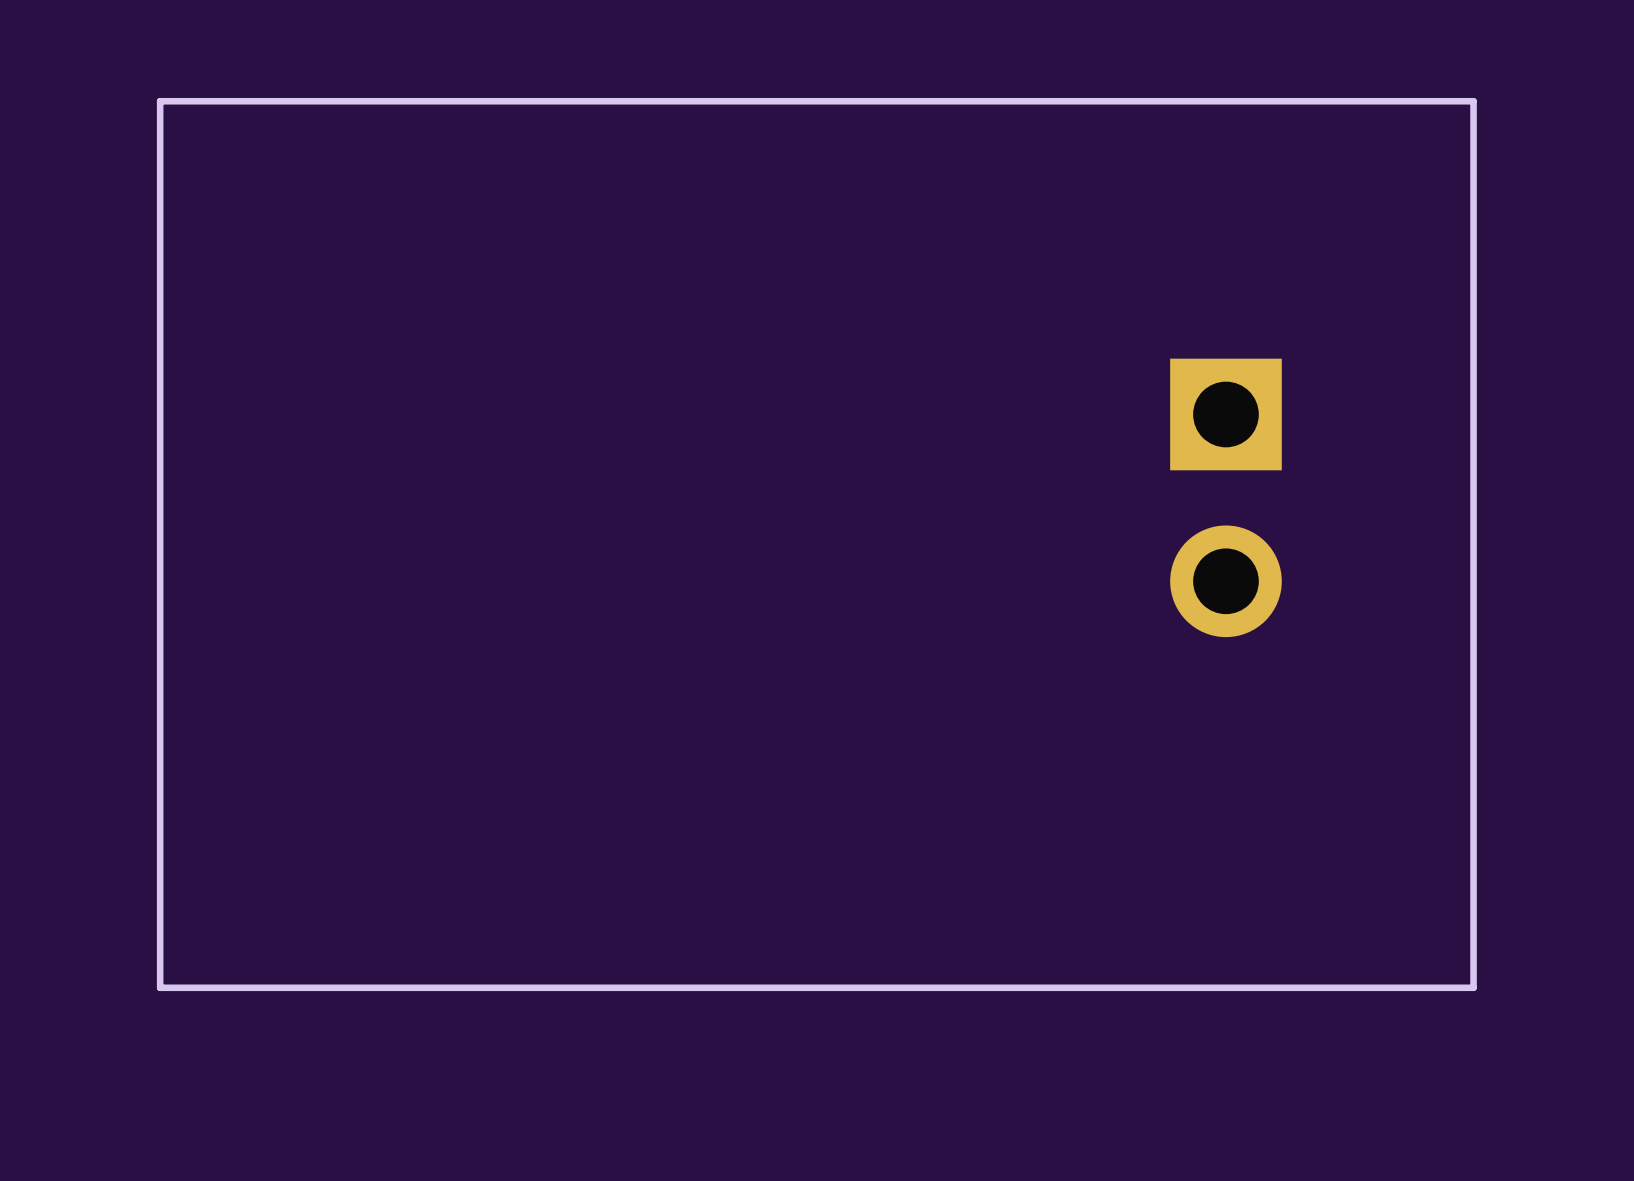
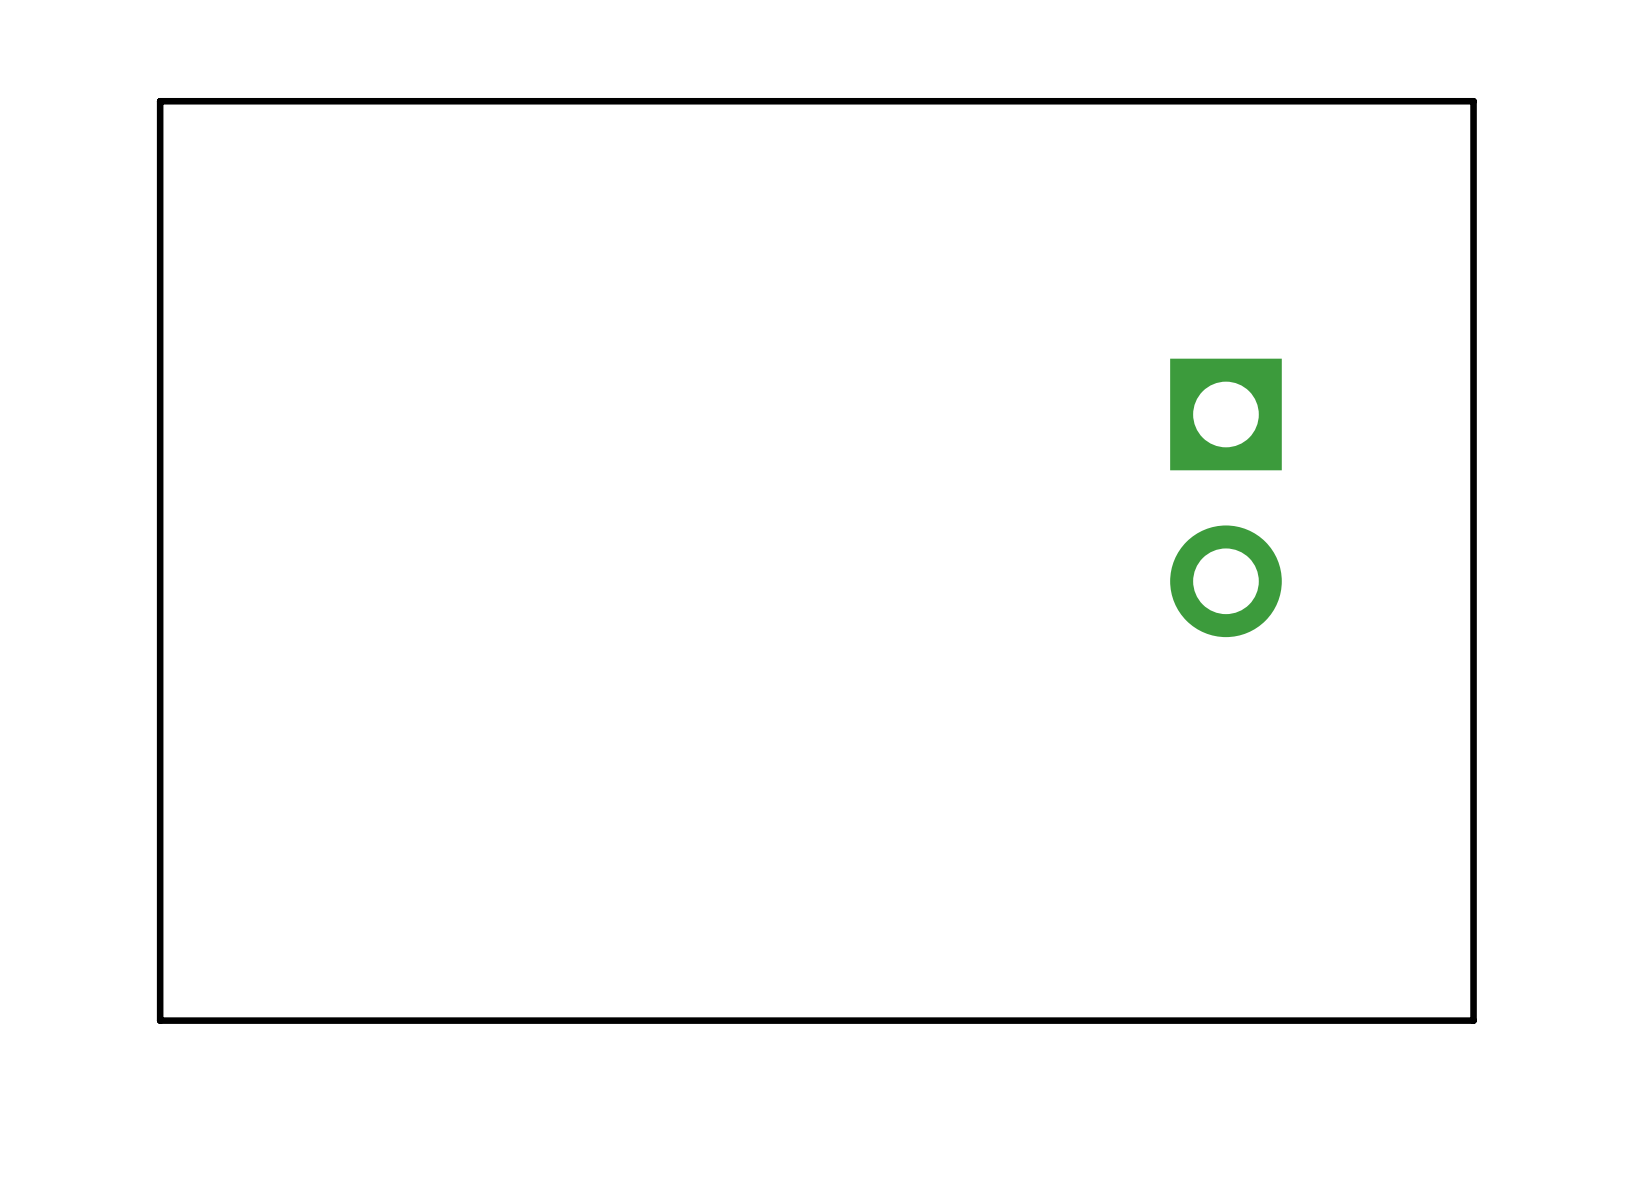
board edge: (1473, 987) (160, 987) -> (1473, 987) (1473, 1020) (160, 1020) (160, 987)

